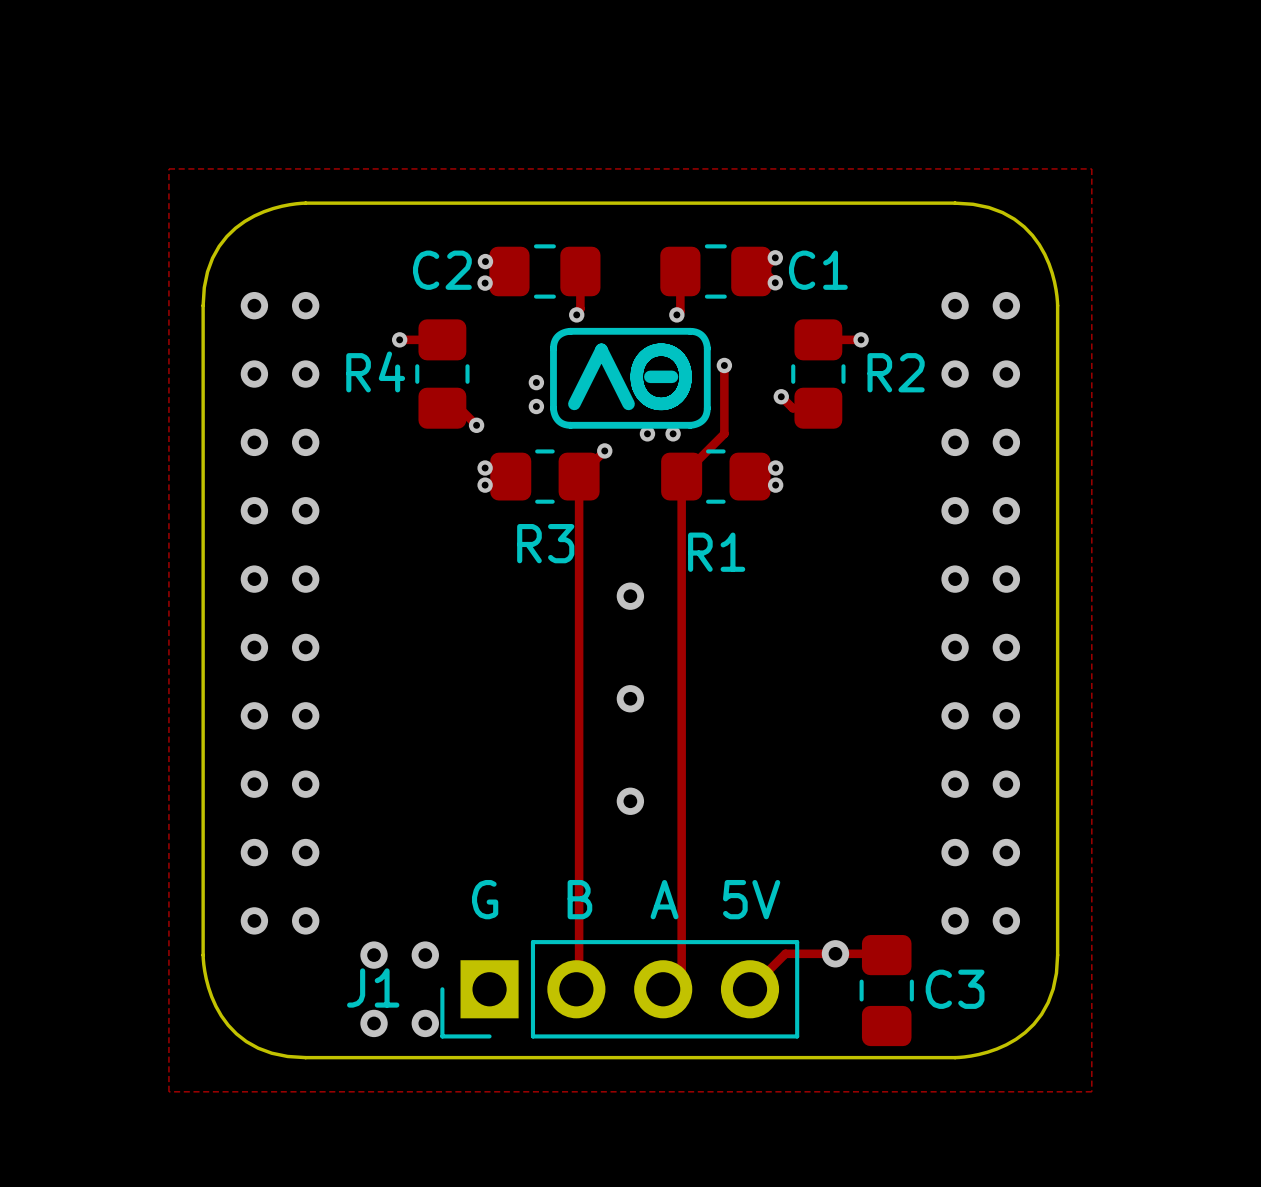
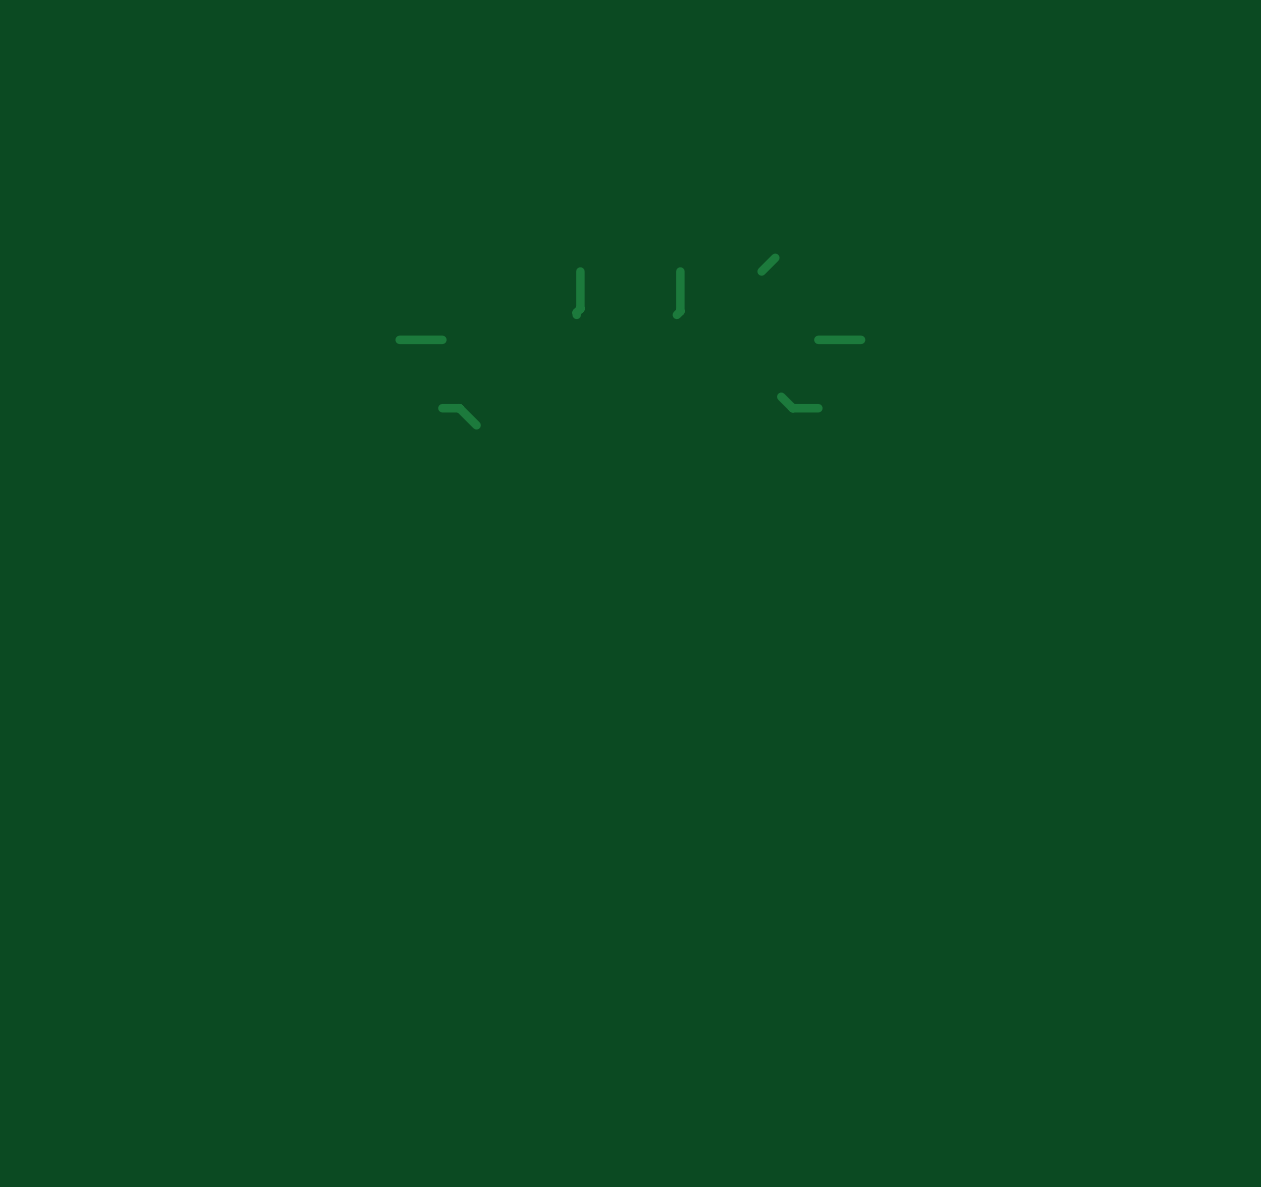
zone outline: (168, 168) (1091, 168) (1091, 1091) (168, 1091) (168, 168) -> none
board edge: (305, 203) (955, 203) (973, 204) (1002, 212) (1014, 219) (1032, 235) (1049, 263) (1054, 281) (1057, 304) (1057, 955) (1056, 973) (1048, 1002) (1041, 1014) (1025, 1032) (996, 1049) (978, 1054) (956, 1057) (305, 1057) (287, 1056) (258, 1048) (246, 1041) (228, 1025) (211, 996) (206, 978) (203, 956) (204, 287) (212, 258) (219, 246) (235, 228) (263, 211) (281, 206) (305, 203) -> none
via: (775, 257) -> none
via: (485, 261) -> none
C2: (544, 271) -> none
C1: (715, 271) -> none
via: (775, 282) -> none
via: (485, 283) -> none
via: (254, 305) -> none
via: (305, 305) -> none
via: (955, 305) -> none
via: (1006, 305) -> none
via: (576, 314) -> none
via: (676, 314) -> none
line: (570, 331) (690, 331) (700, 333) (705, 339) (707, 347) (707, 408) (704, 418) (698, 423) (690, 425) (570, 425) (560, 422) (555, 416) (553, 408) (553, 345) (558, 335) (570, 331) -> none
via: (399, 339) -> none
via: (861, 339) -> none
line: (658, 349) (649, 352) (642, 359) (637, 368) (636, 379) (639, 390) (645, 398) (653, 402) (663, 403) (672, 400) (680, 394) (684, 385) (685, 373) (682, 363) (676, 355) (668, 350) (658, 349) -> none
track: (724, 365) (724, 433) (681, 476) (681, 970) (663, 989) -> none
via: (724, 365) -> none
via: (254, 374) -> none
via: (305, 374) -> none
R4: (442, 374) -> none
R2: (818, 374) -> none
via: (955, 374) -> none
via: (1006, 374) -> none
line: (650, 376) (672, 376) -> none
via: (536, 382) -> none
via: (781, 396) -> none
line: (574, 403) (601, 349) (628, 403) -> none
via: (536, 406) -> none
via: (476, 425) -> none
via: (647, 433) -> none
via: (673, 433) -> none
via: (254, 442) -> none
via: (305, 442) -> none
via: (955, 442) -> none
via: (1006, 442) -> none
track: (604, 450) (579, 476) (579, 986) (576, 989) -> none
via: (604, 450) -> none
via: (485, 468) -> none
via: (775, 468) -> none
R3: (544, 476) -> none
R1: (715, 476) -> none
via: (485, 485) -> none
via: (775, 485) -> none
via: (254, 510) -> none
via: (305, 510) -> none
via: (955, 510) -> none
via: (1006, 510) -> none
via: (254, 579) -> none
via: (305, 579) -> none
via: (955, 579) -> none
via: (1006, 579) -> none
via: (630, 596) -> none
via: (254, 647) -> none
via: (305, 647) -> none
via: (955, 647) -> none
via: (1006, 647) -> none
via: (630, 698) -> none
via: (254, 715) -> none
via: (305, 715) -> none
via: (955, 715) -> none
via: (1006, 715) -> none
via: (254, 784) -> none
via: (305, 784) -> none
via: (955, 784) -> none
via: (1006, 784) -> none
via: (630, 801) -> none
via: (254, 852) -> none
via: (305, 852) -> none
via: (955, 852) -> none
via: (1006, 852) -> none
text: G (485, 899) -> none
text: B (579, 899) -> none
text: A (664, 899) -> none
text: 5V (751, 899) -> none
via: (254, 920) -> none
via: (305, 920) -> none
via: (955, 920) -> none
via: (1006, 920) -> none
via: (835, 953) -> none
via: (374, 955) -> none
via: (425, 955) -> none
track: (886, 955) (785, 953) (750, 989) -> none
J1: (619, 989) -> none
C3: (886, 990) -> none
via: (374, 1023) -> none
via: (425, 1023) -> none

